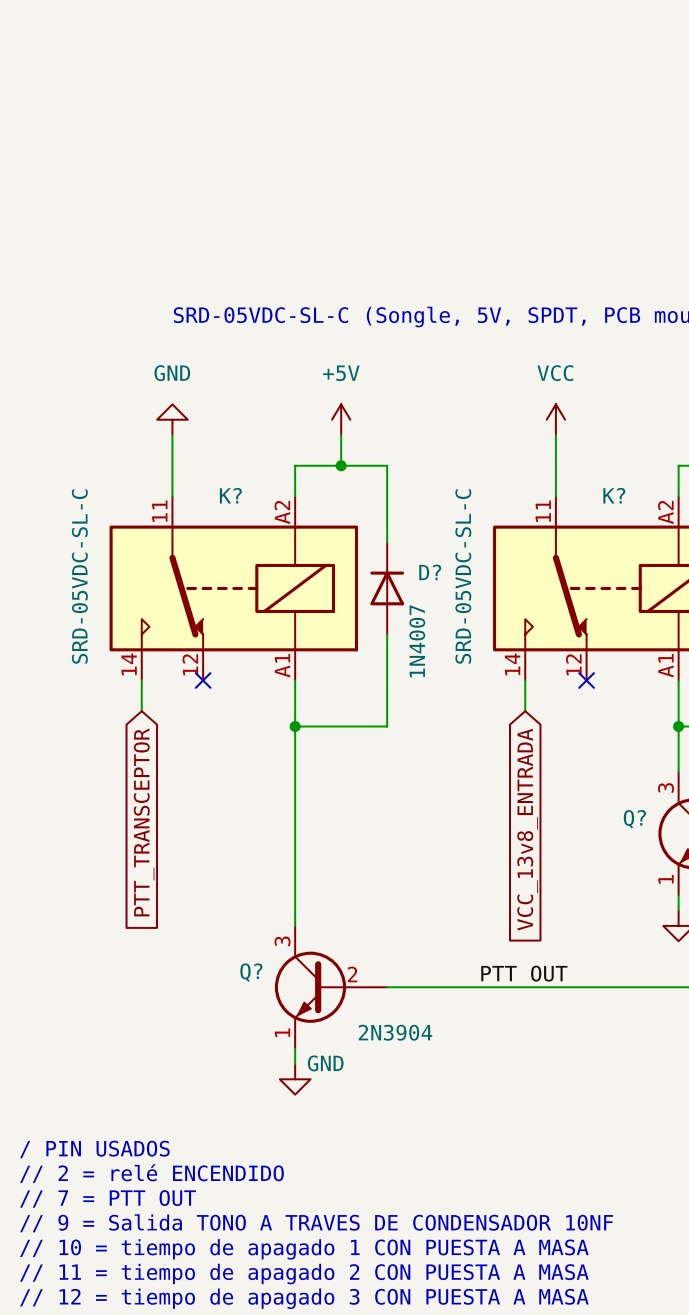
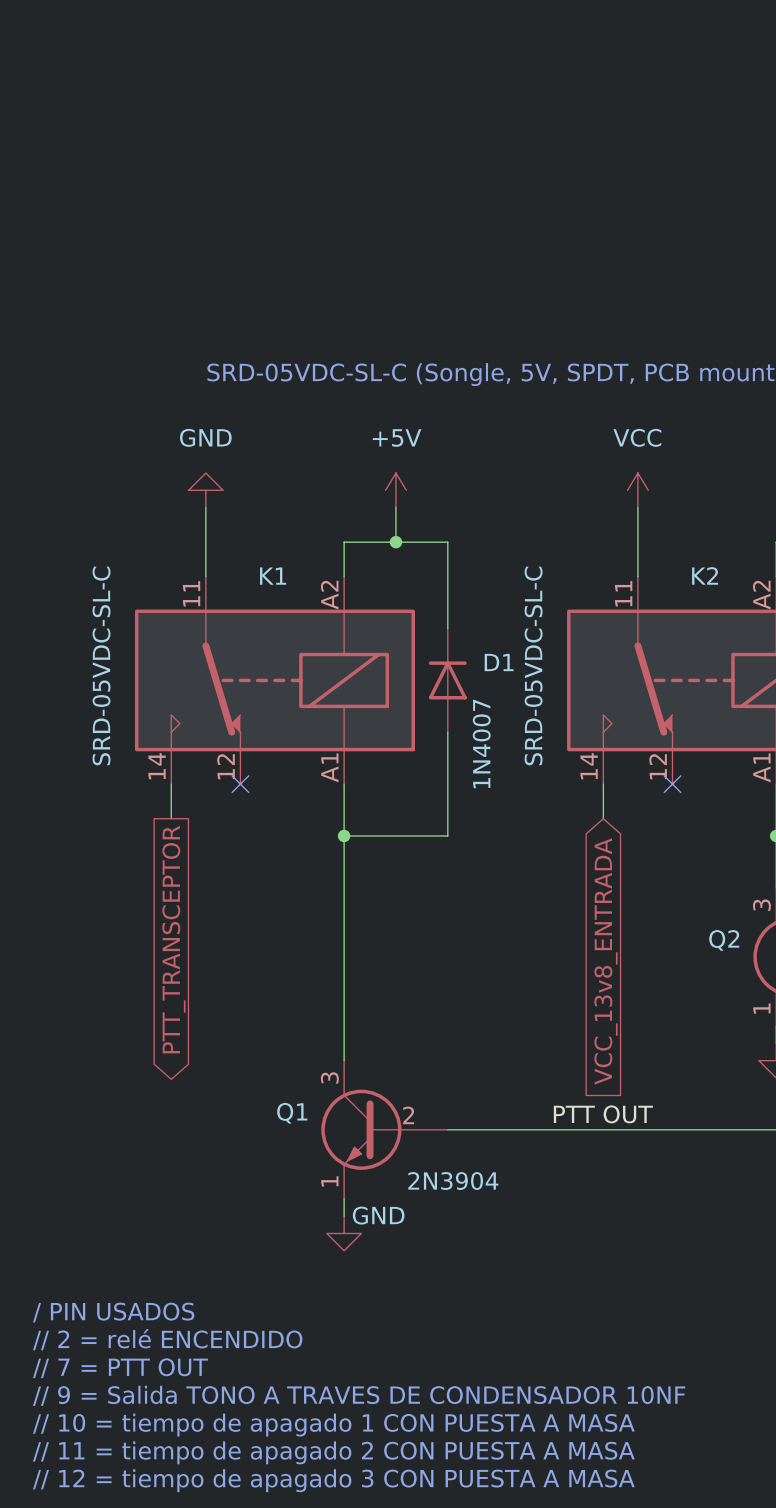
K? name: K? (230, 495) -> K1 (273, 576)
K? name: K? (614, 495) -> K2 (705, 575)
D? name: D? (430, 572) -> D1 (499, 662)
Q? name: Q? (634, 819) -> Q2 (724, 940)
global label shape: input (144, 822) -> output (173, 939)
Q? name: Q? (251, 972) -> Q1 (292, 1113)

